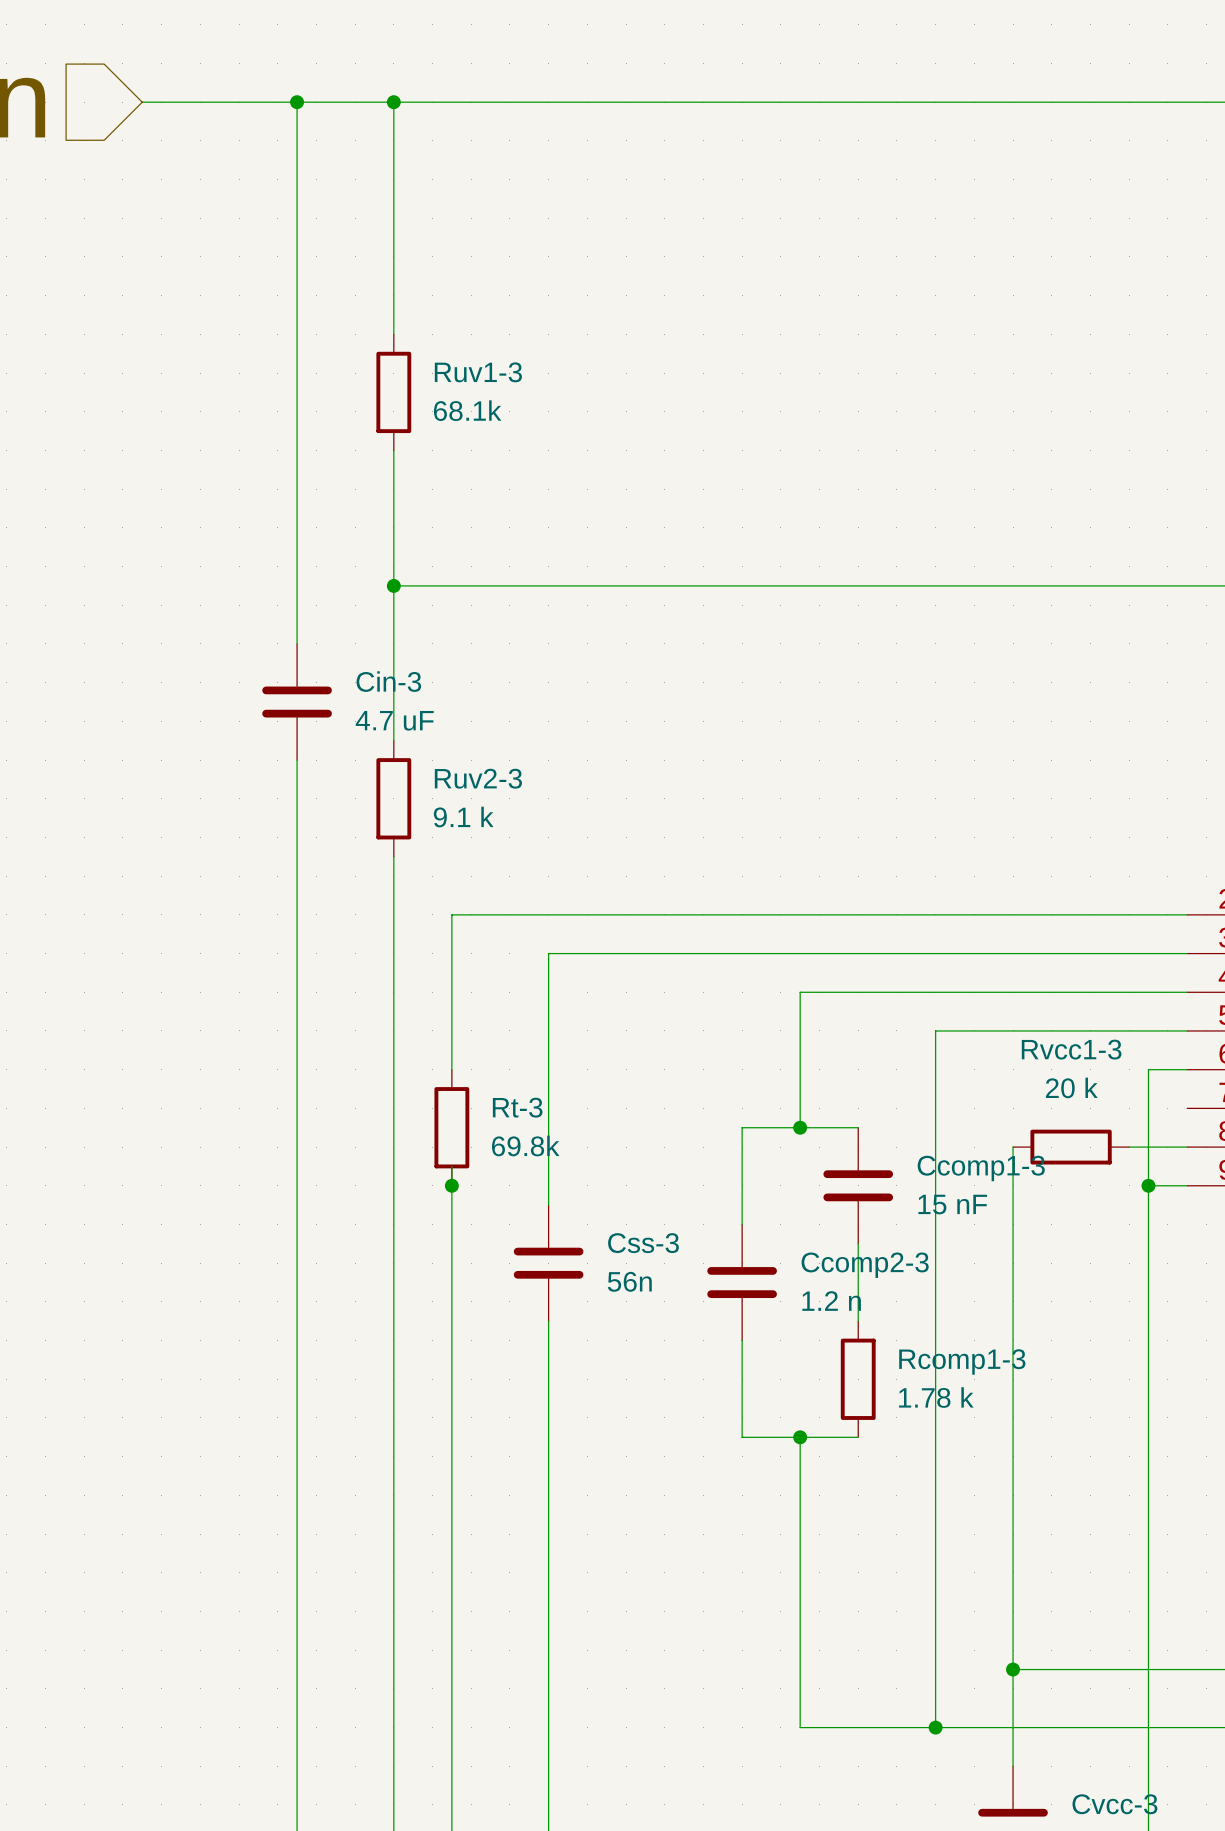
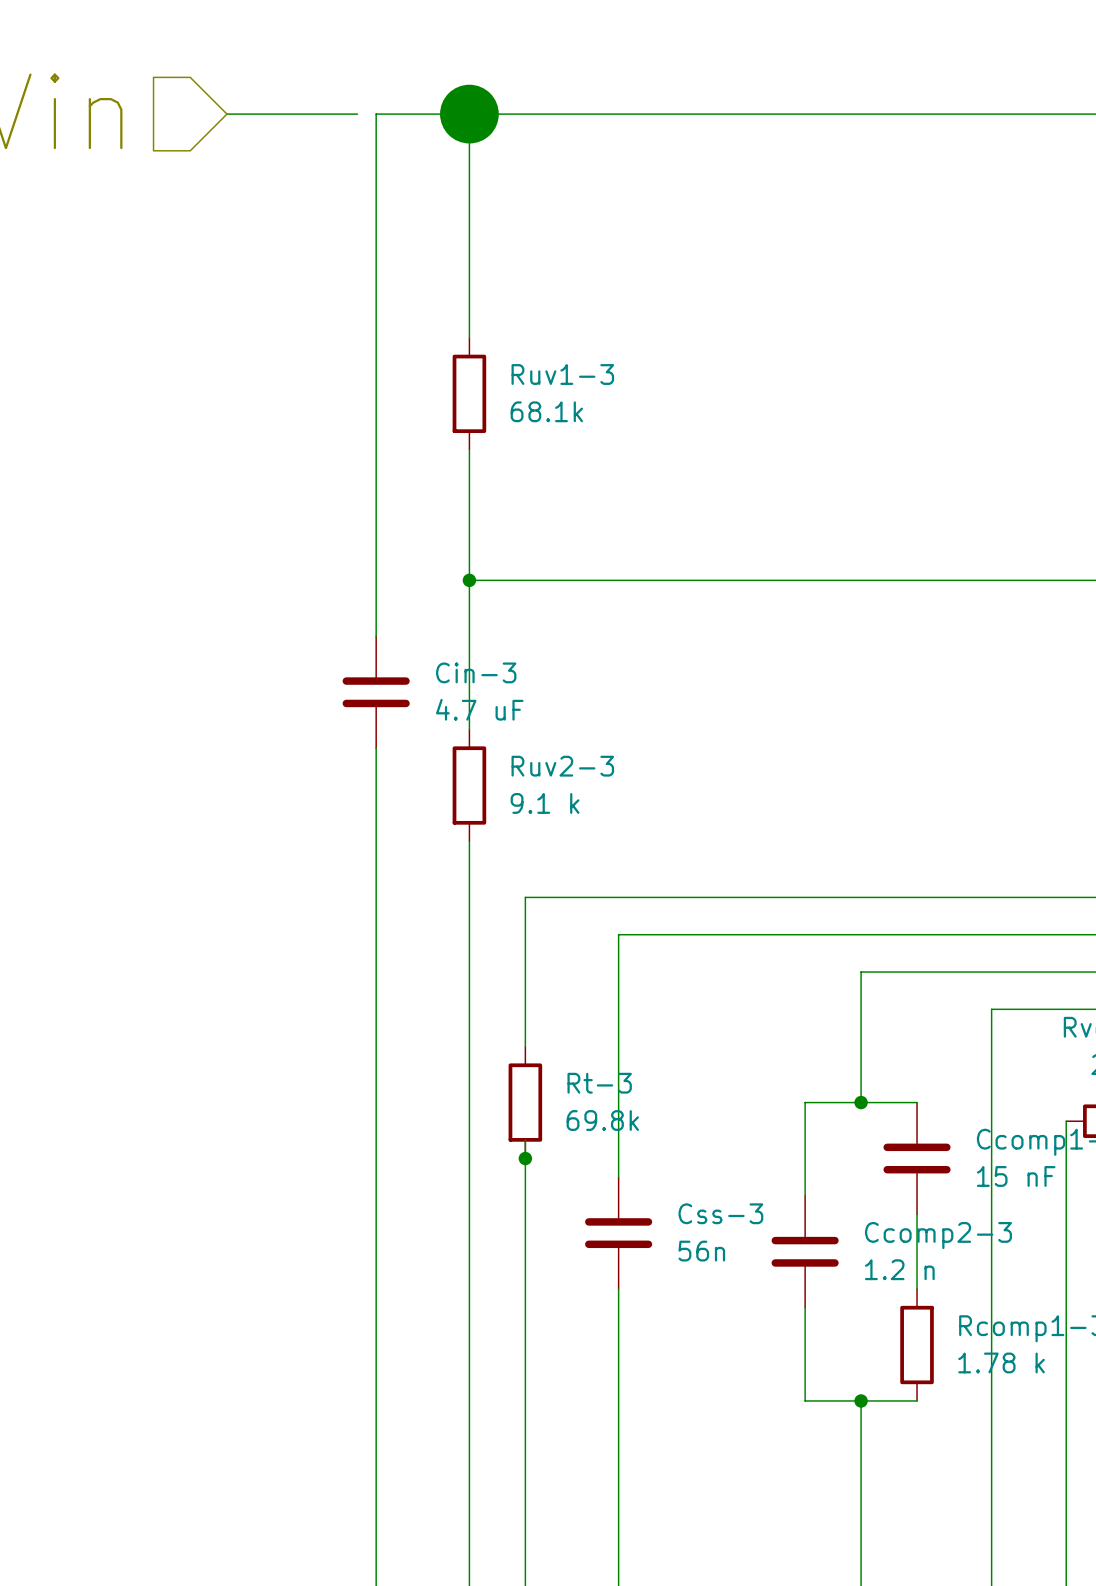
junction size: [386, 95, 401, 110] -> [440, 84, 499, 144]
wire: (277, 102) (297, 102) -> none
junction: (297, 102) -> none

